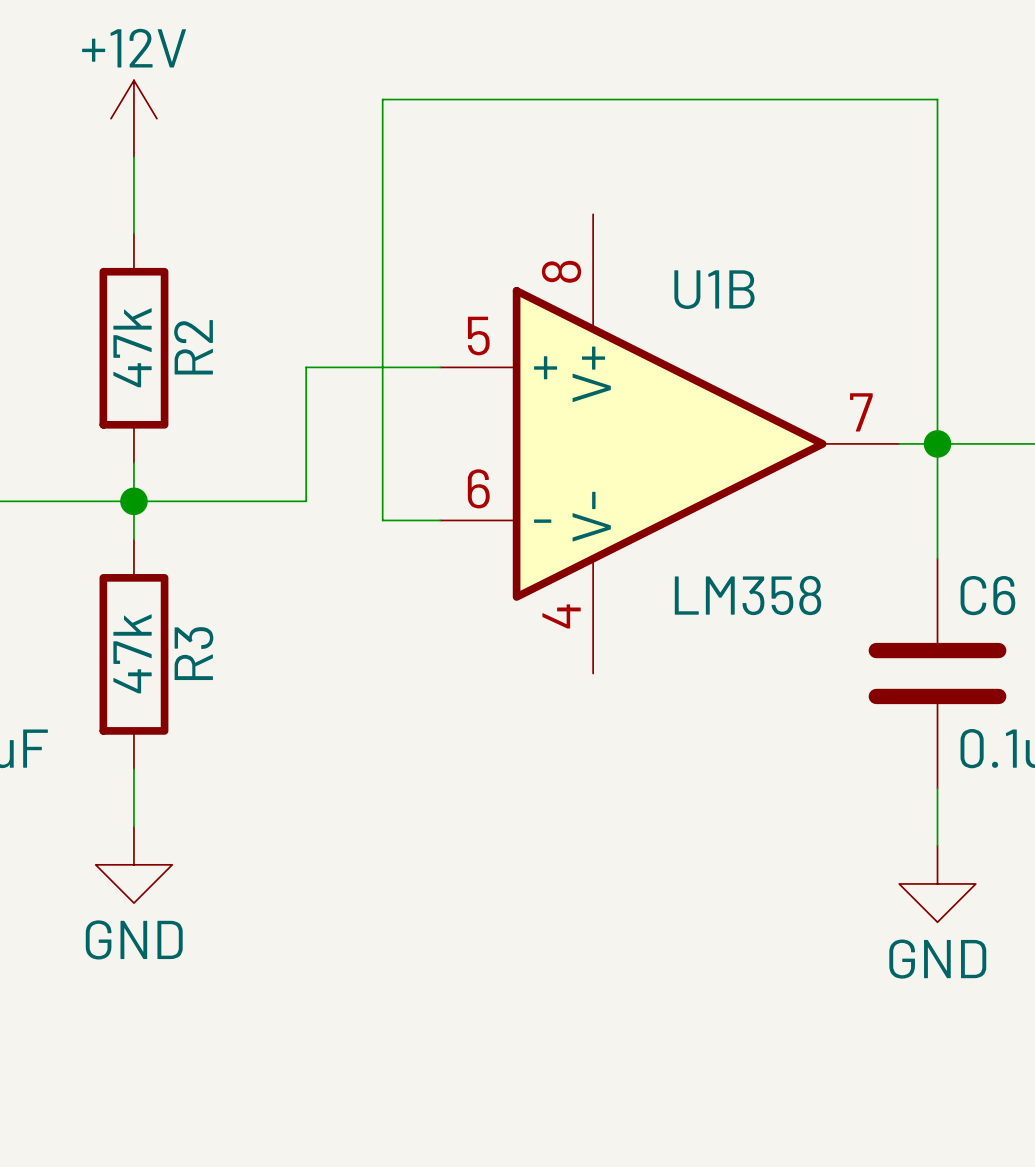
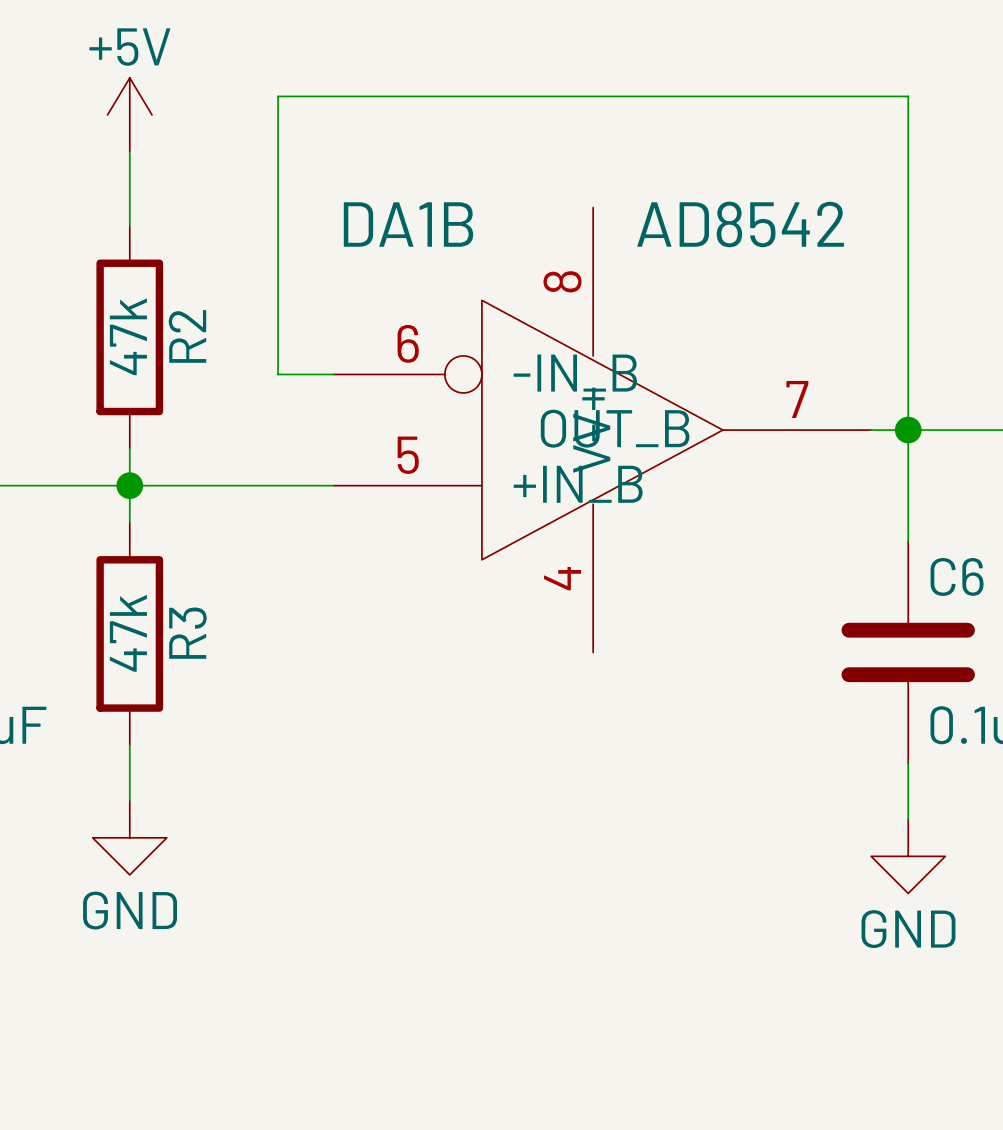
wire: (382, 99) (382, 520) (440, 520) -> (370, 96) (278, 96) (278, 374) (333, 374)
power symbol: +12V (133, 118) -> +5V (129, 114)
wire: (440, 367) (306, 367) (306, 501) -> (333, 485) (296, 485)
DA1B: none -> AD8542 (602, 430)
U1B: LM358 (669, 443) -> none

